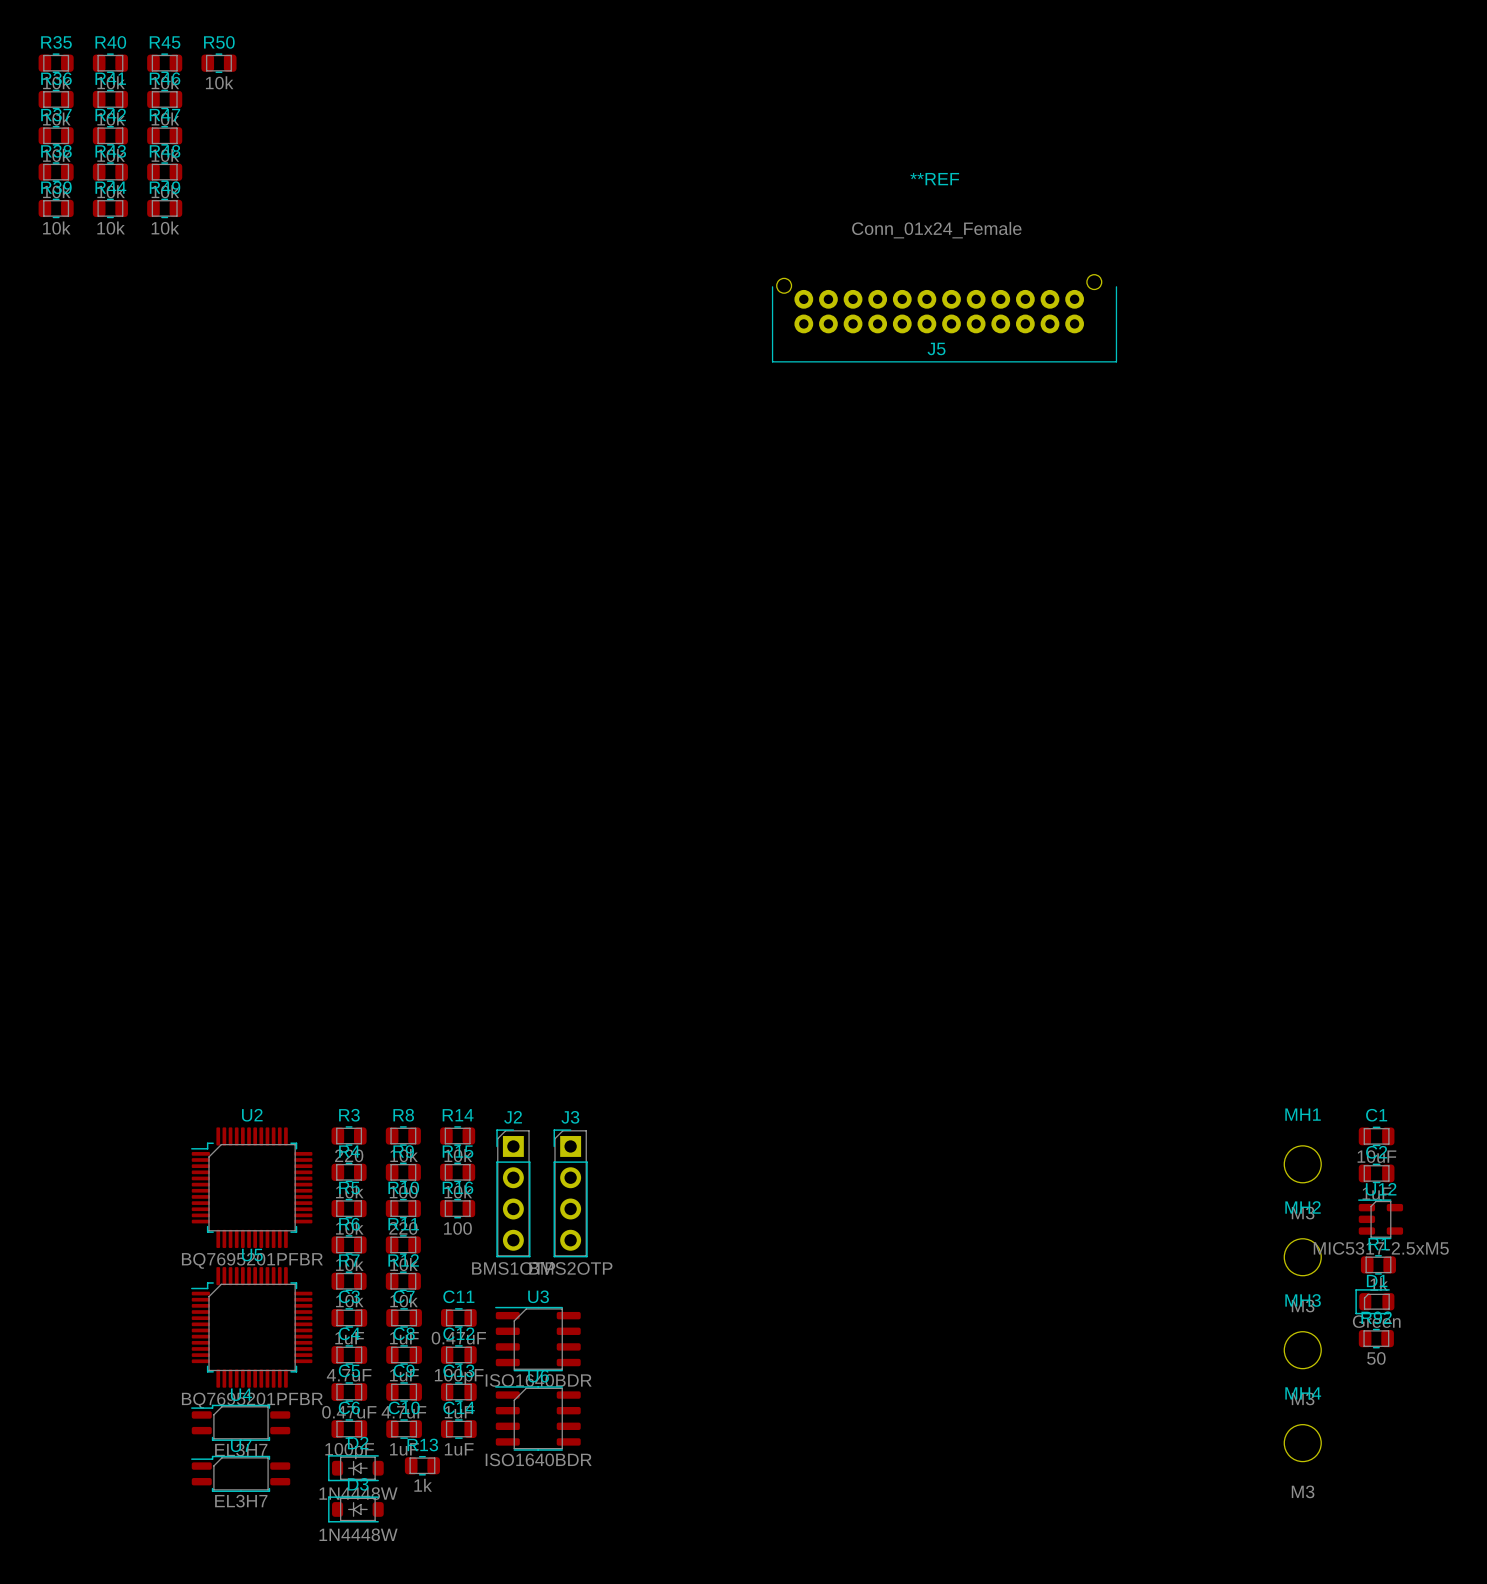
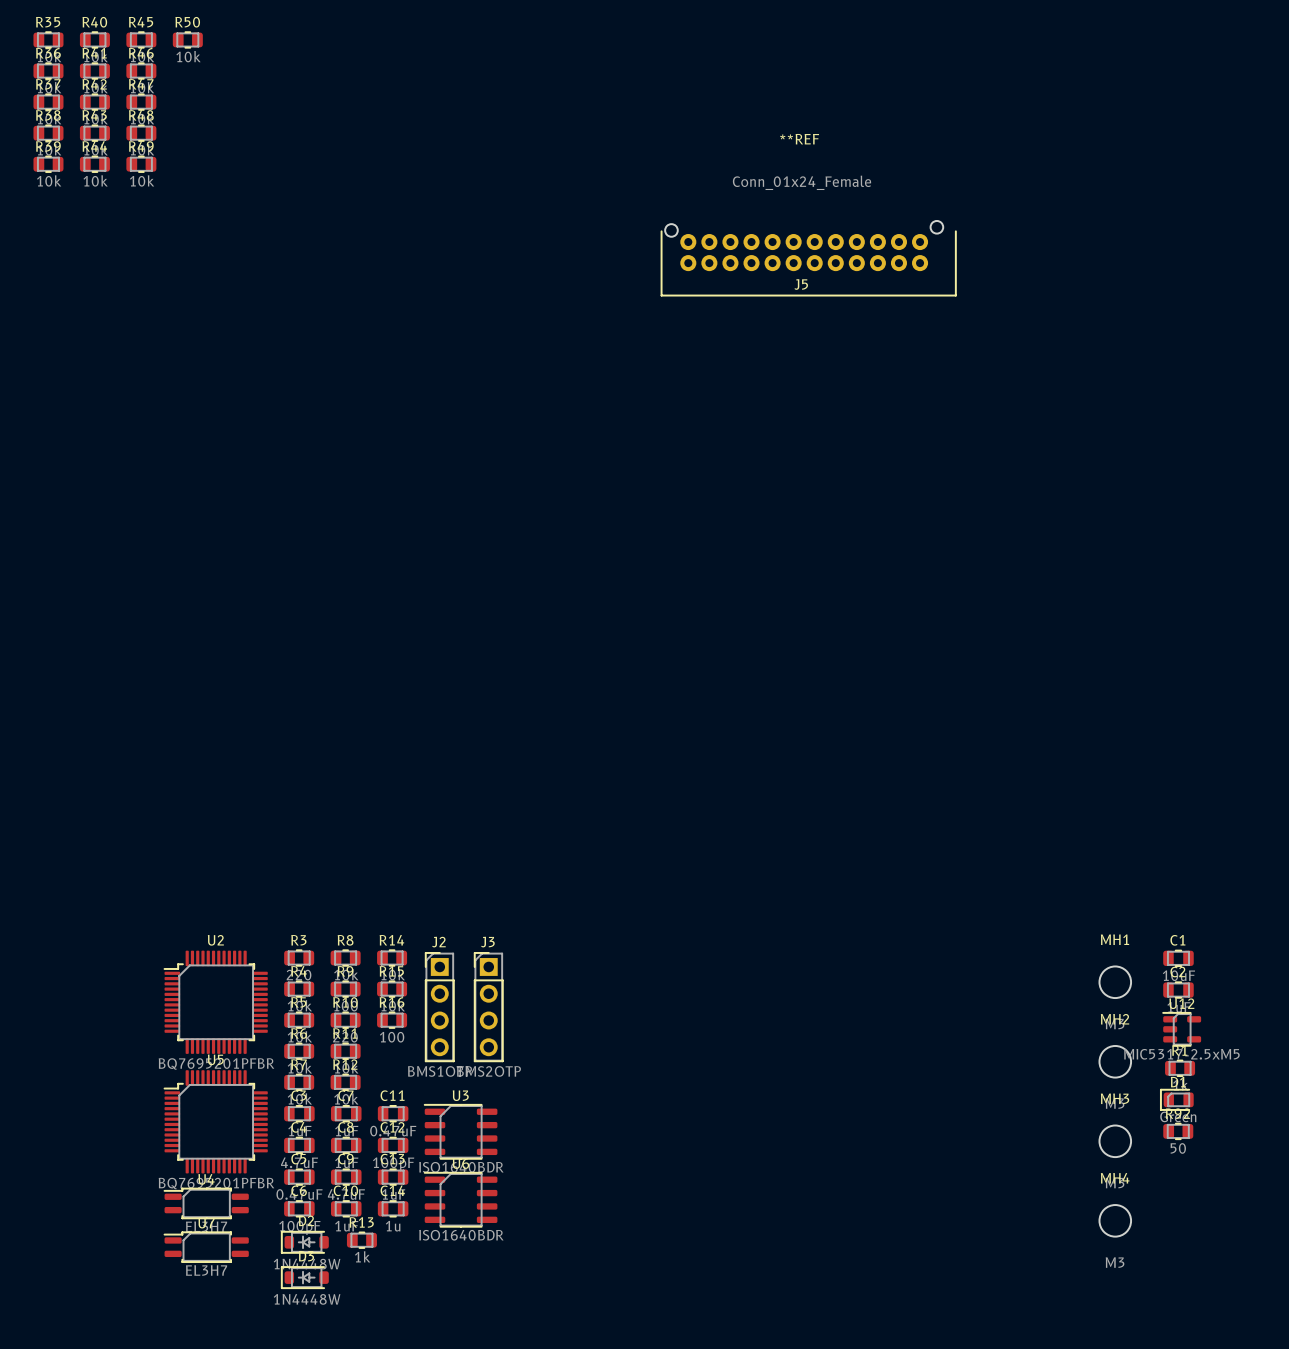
C14 value: 1uF (459, 1449) -> 1u (393, 1226)

